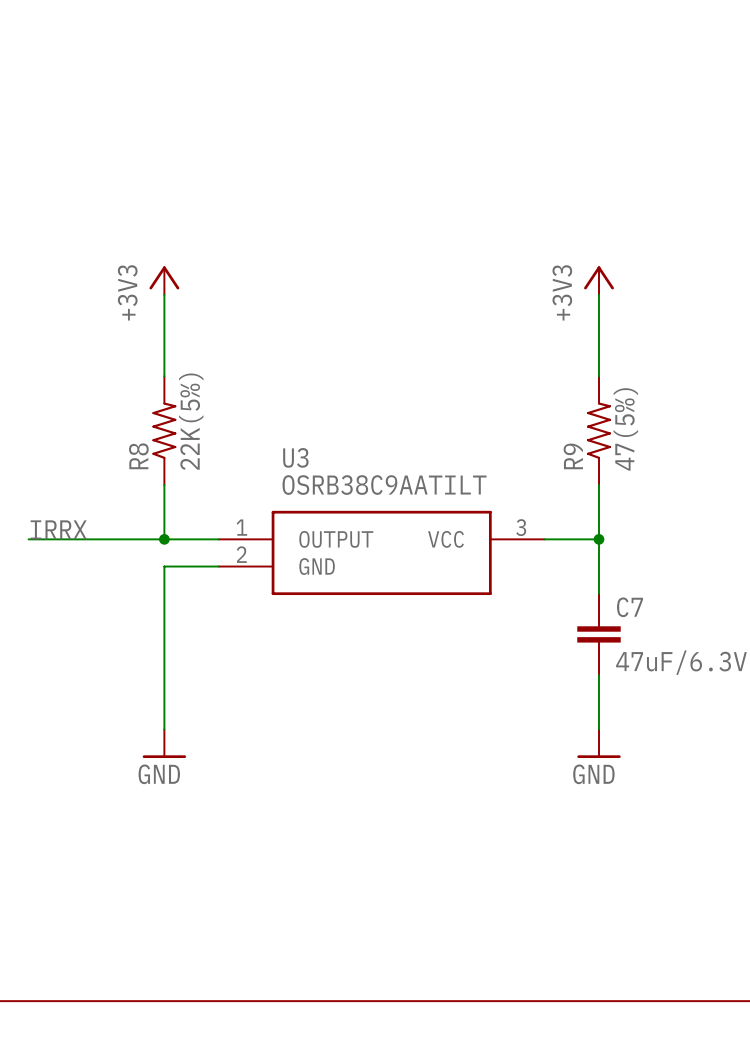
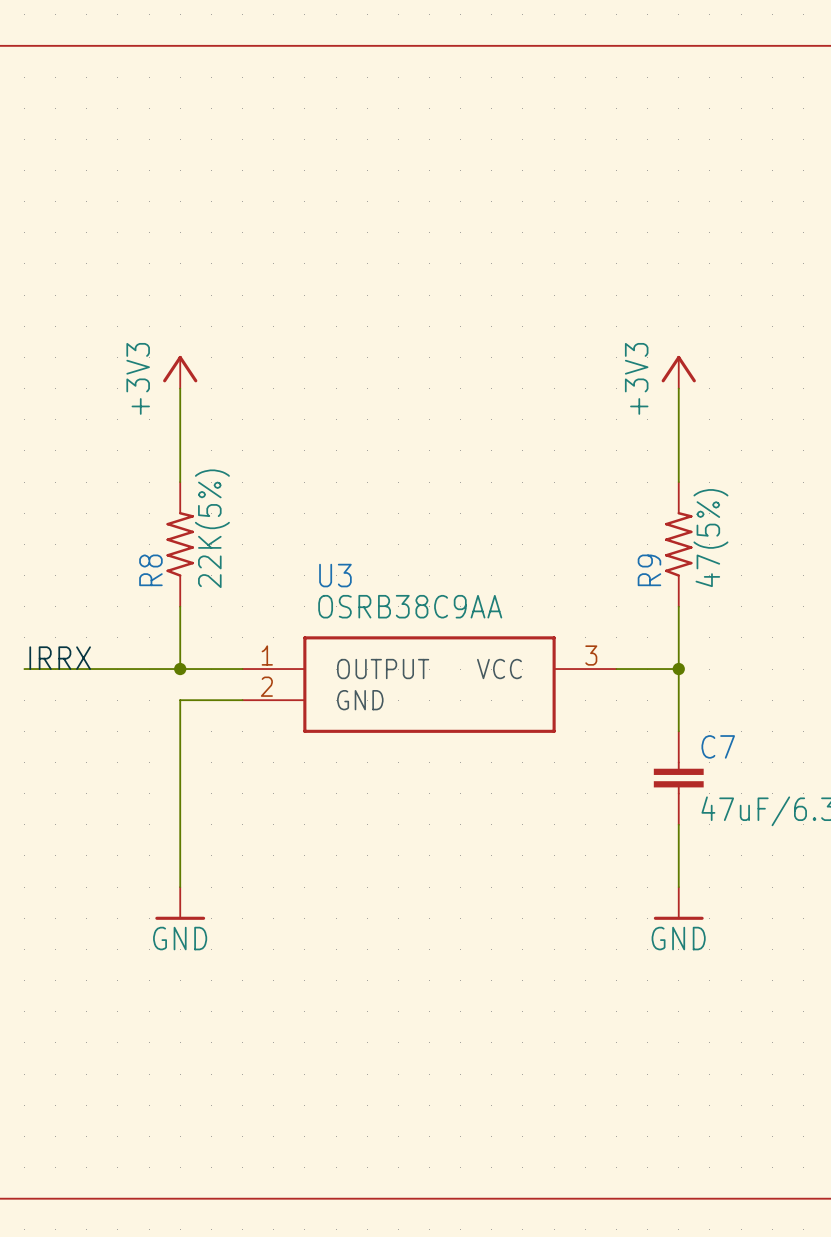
U3 value: OSRB38C9AATILT (384, 485) -> OSRB38C9AA (410, 606)

